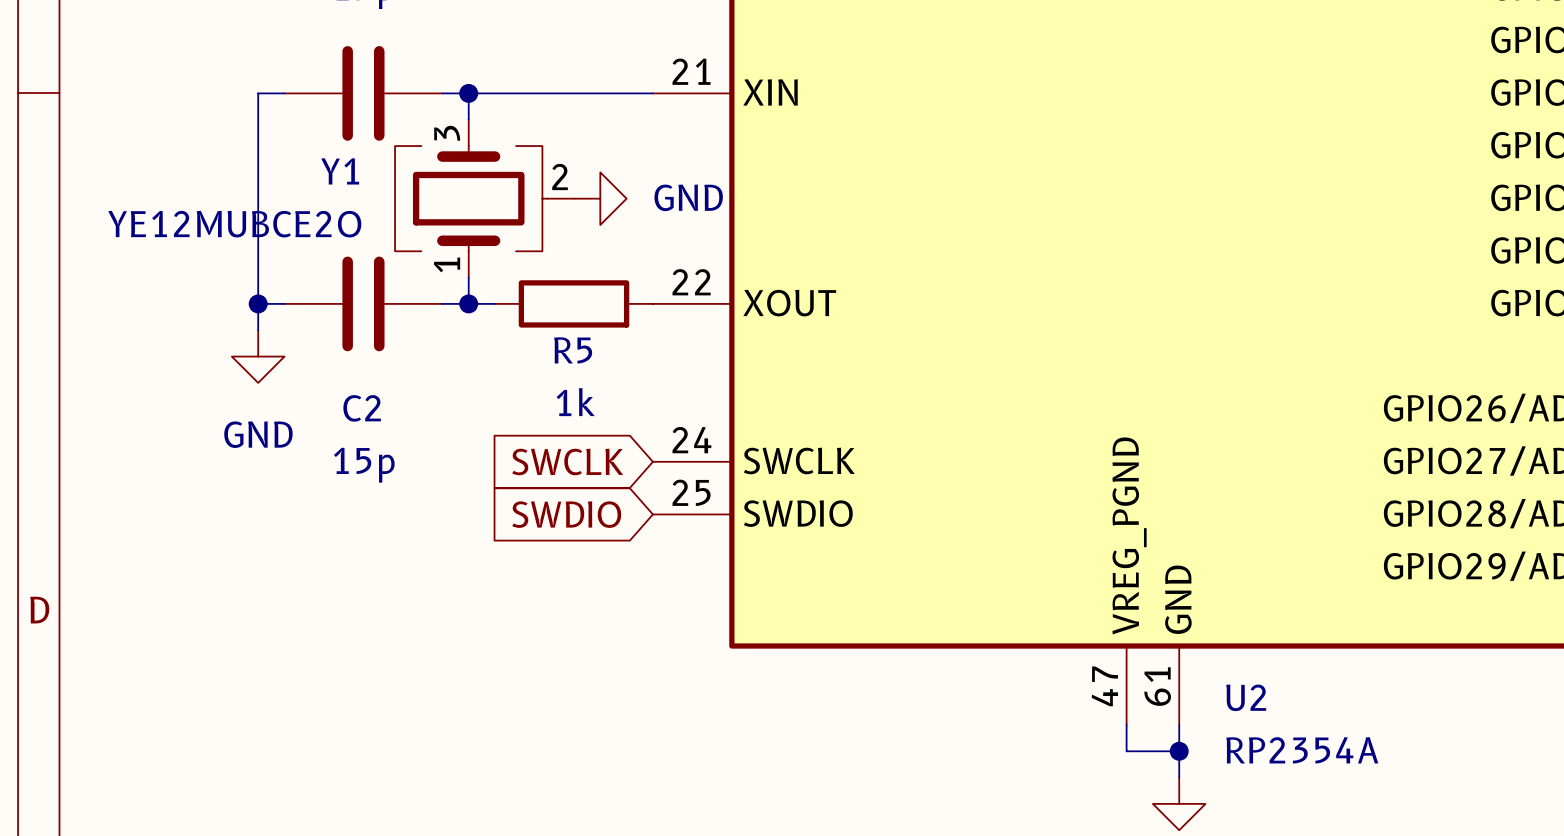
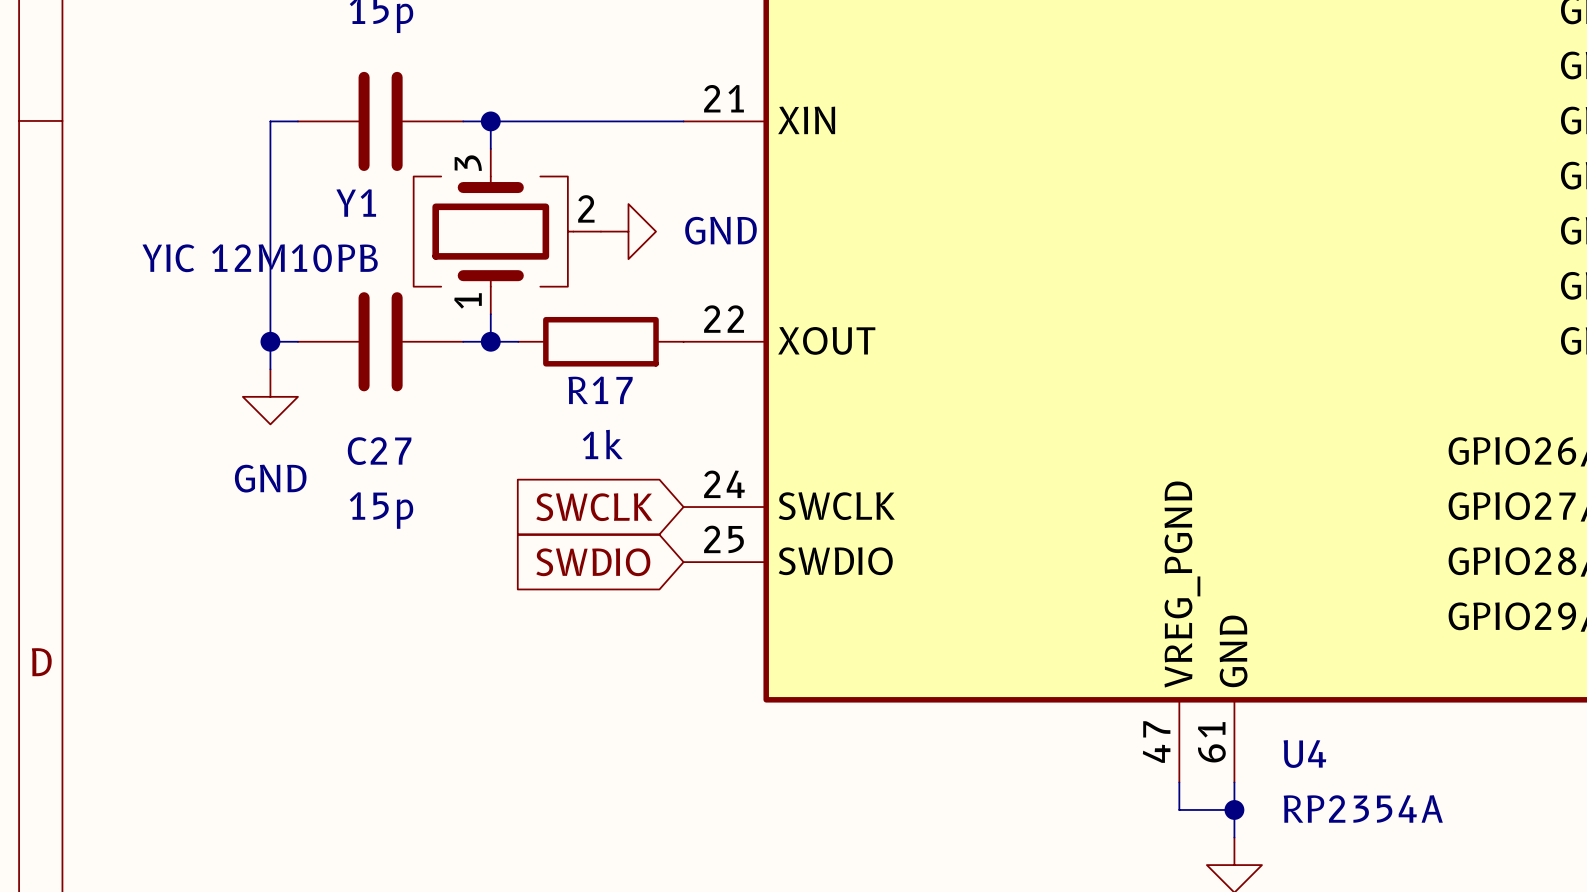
Y1 value: YE12MUBCE2O (234, 224) -> YIC 12M10PB (260, 258)
R5 name: R5 (573, 350) -> R17 (600, 390)
C2 name: C2 (362, 408) -> C27 (379, 451)
U2 name: U2 (1246, 697) -> U4 (1304, 754)

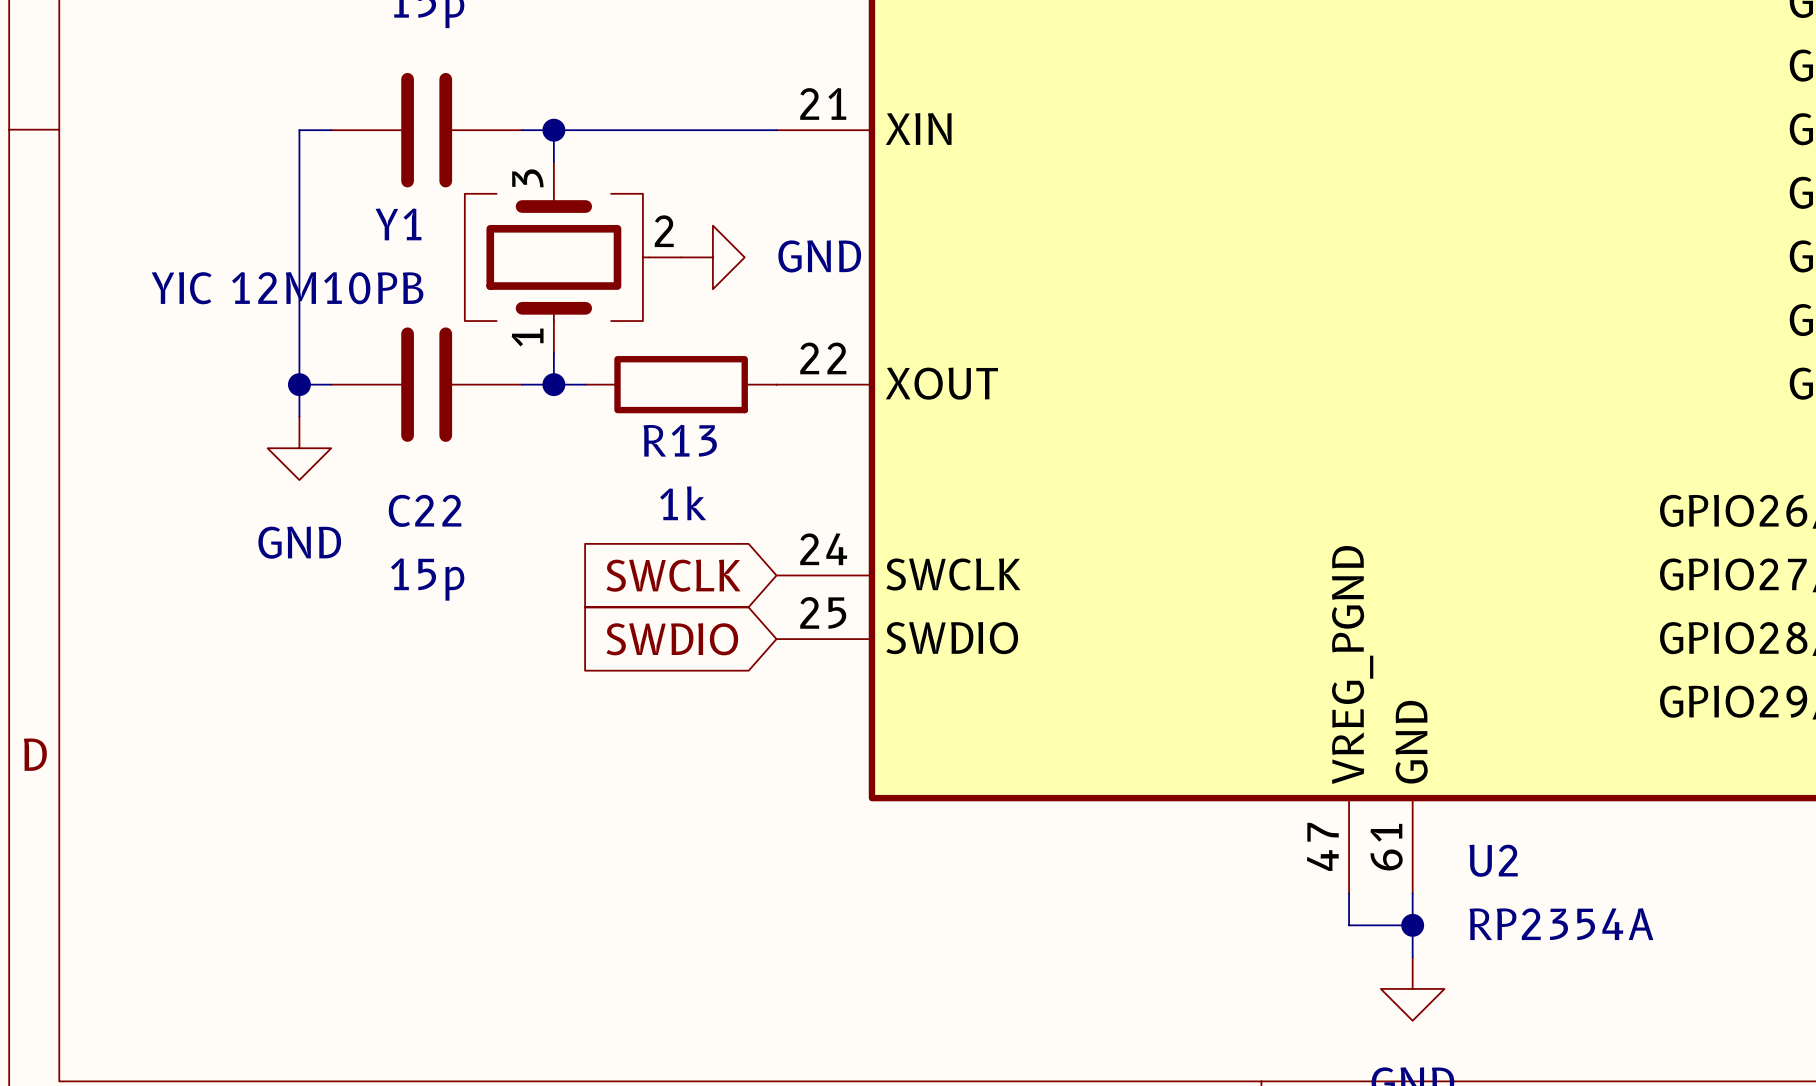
R17 name: R17 (600, 390) -> R13 (680, 440)
C27 name: C27 (379, 451) -> C22 (425, 510)
U4 name: U4 (1304, 754) -> U2 (1493, 860)

